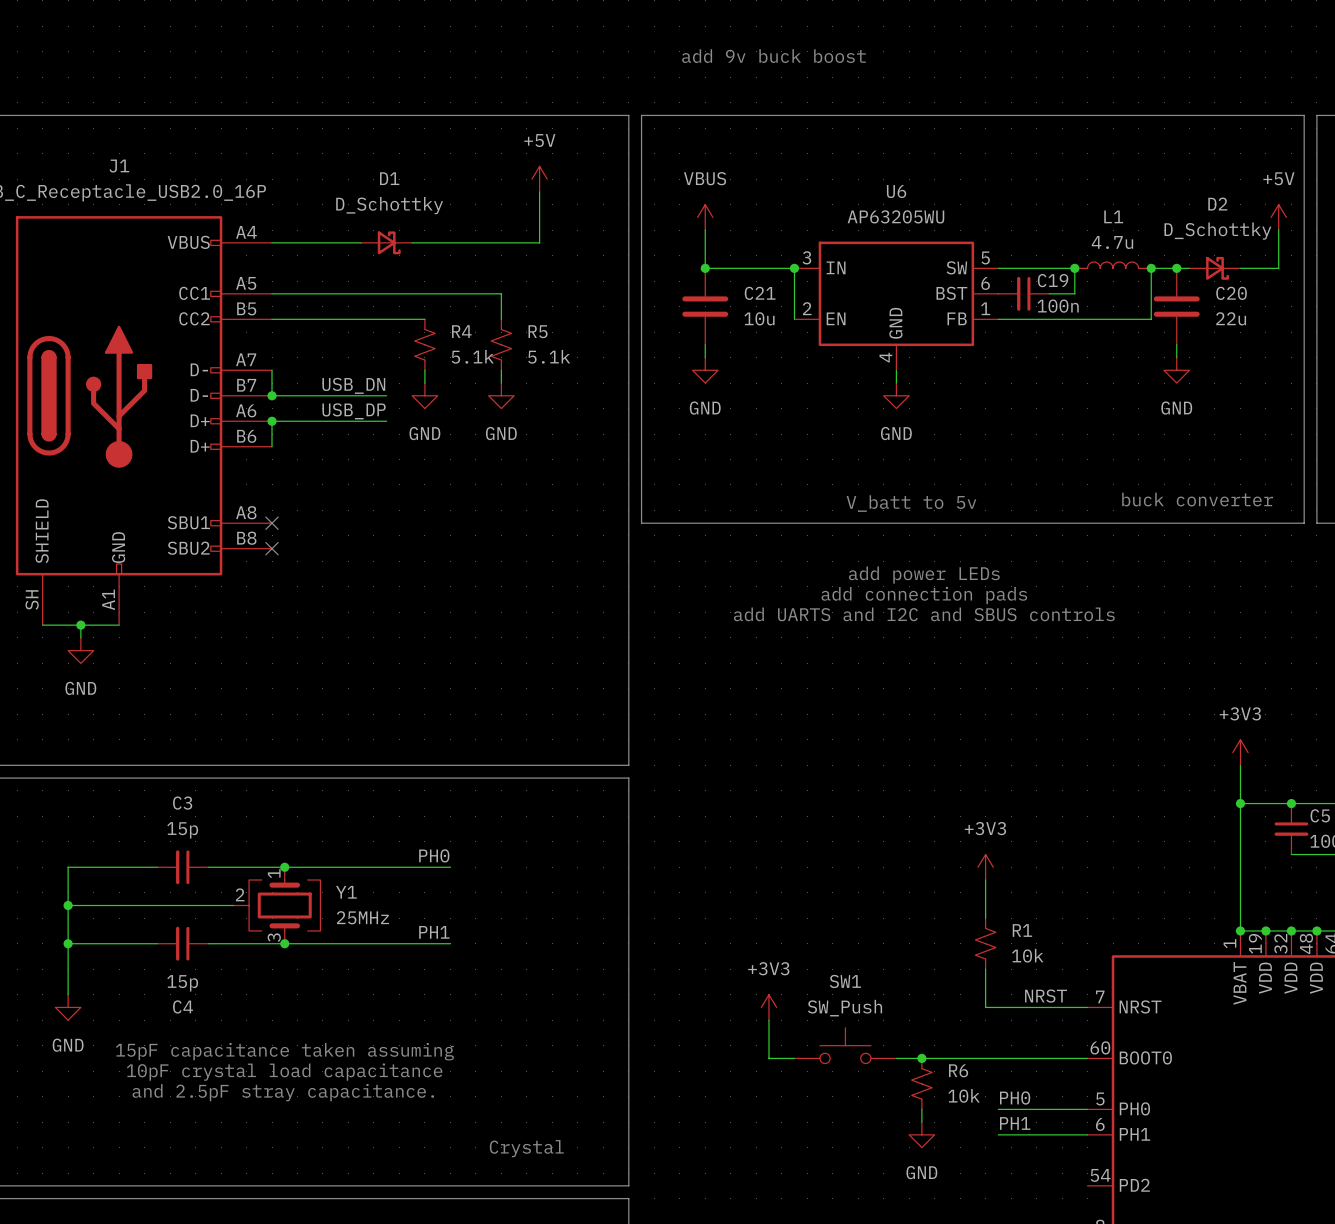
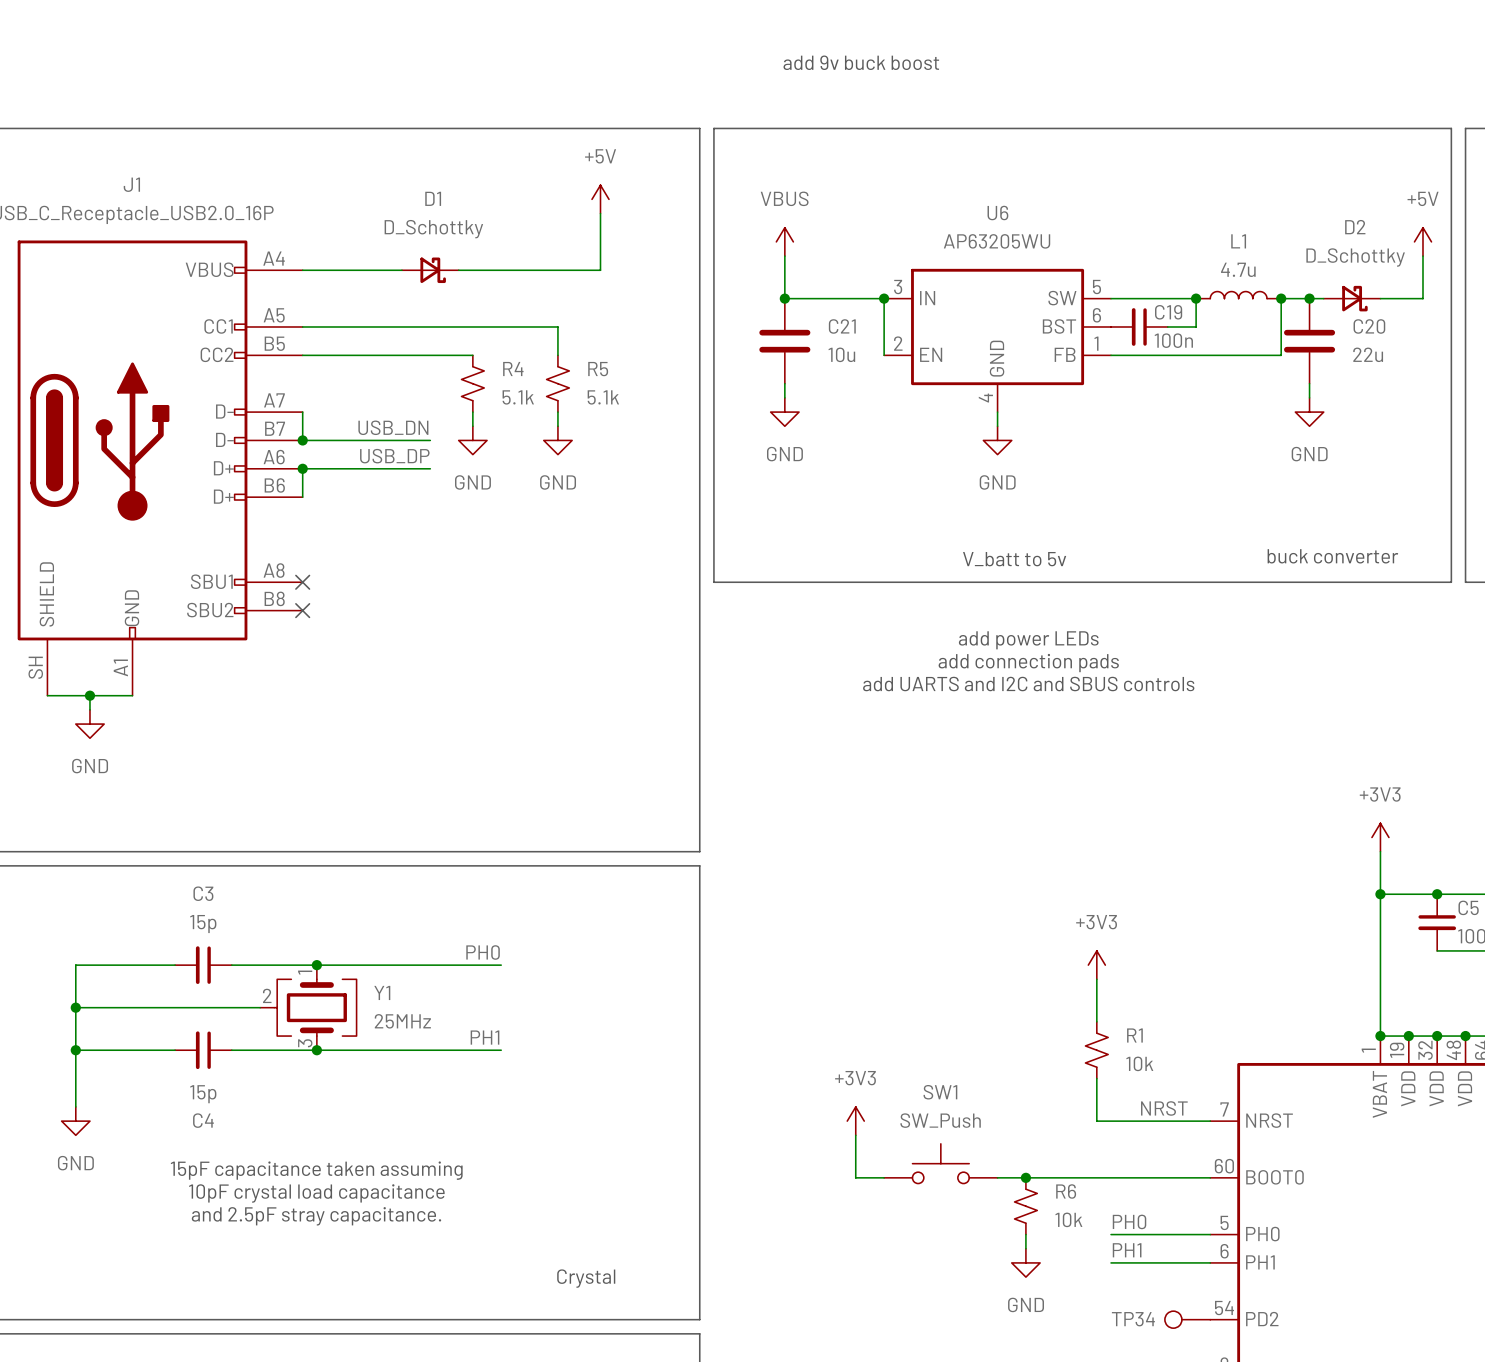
TP34: none -> (1187, 1319)

